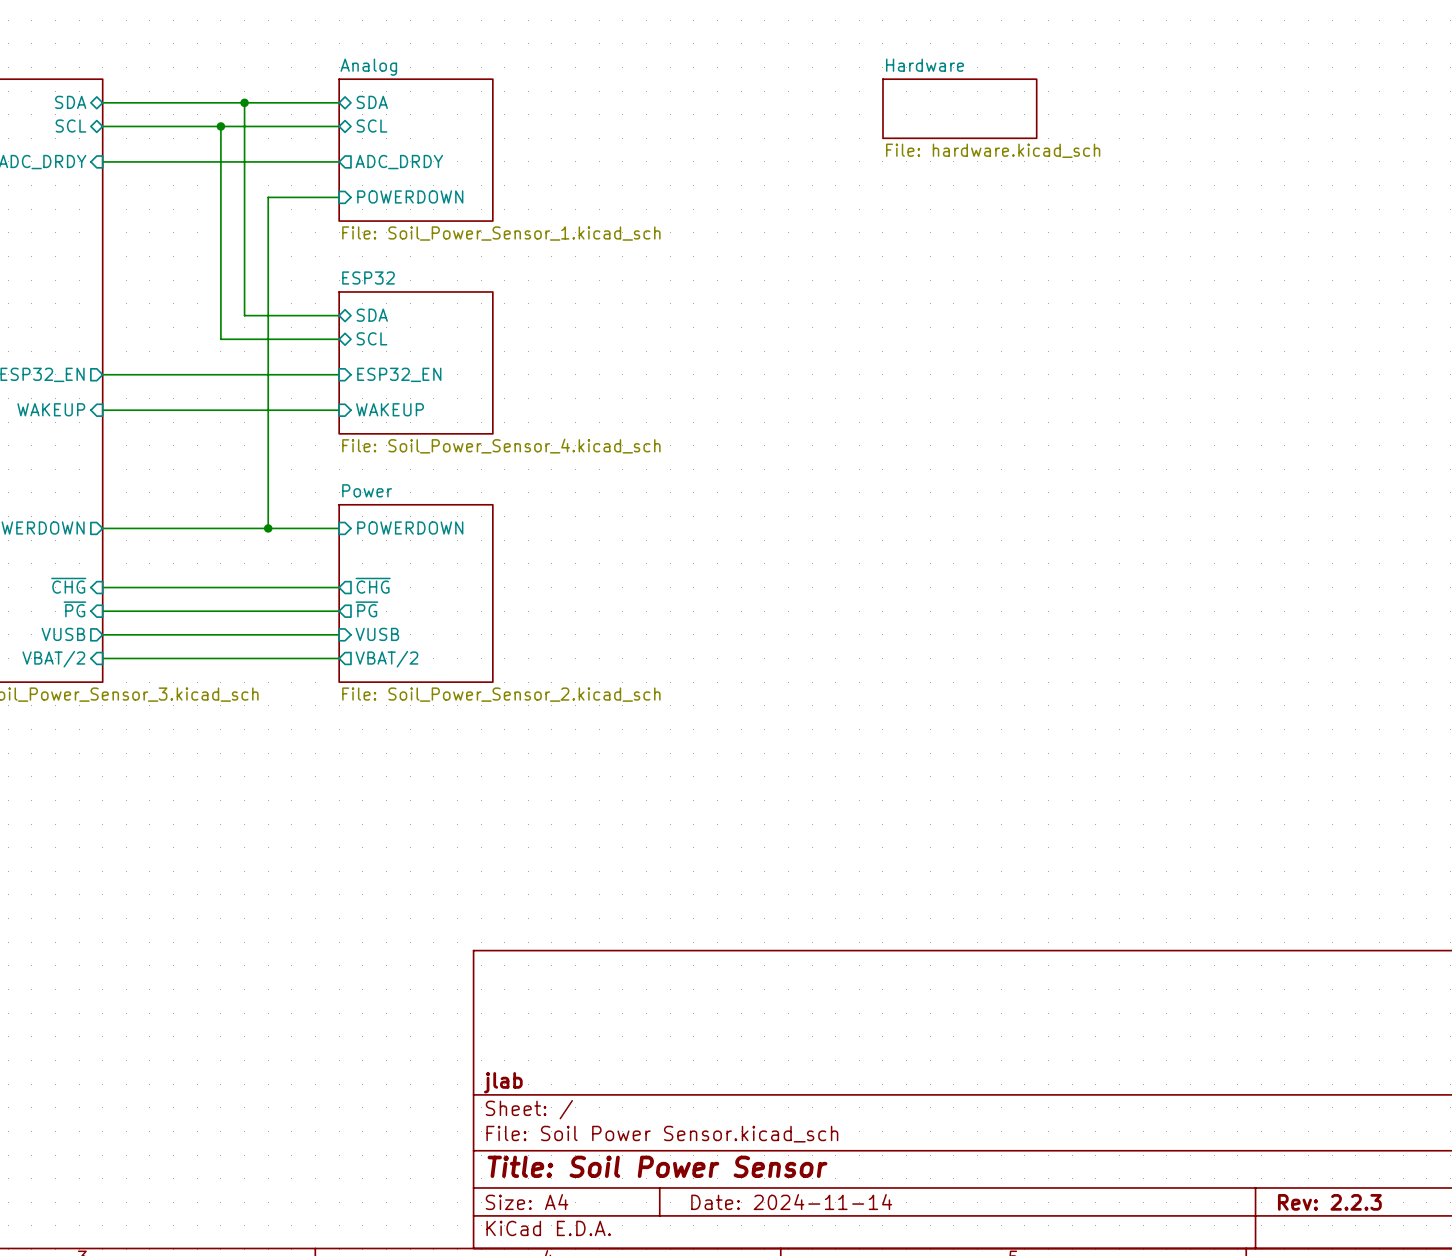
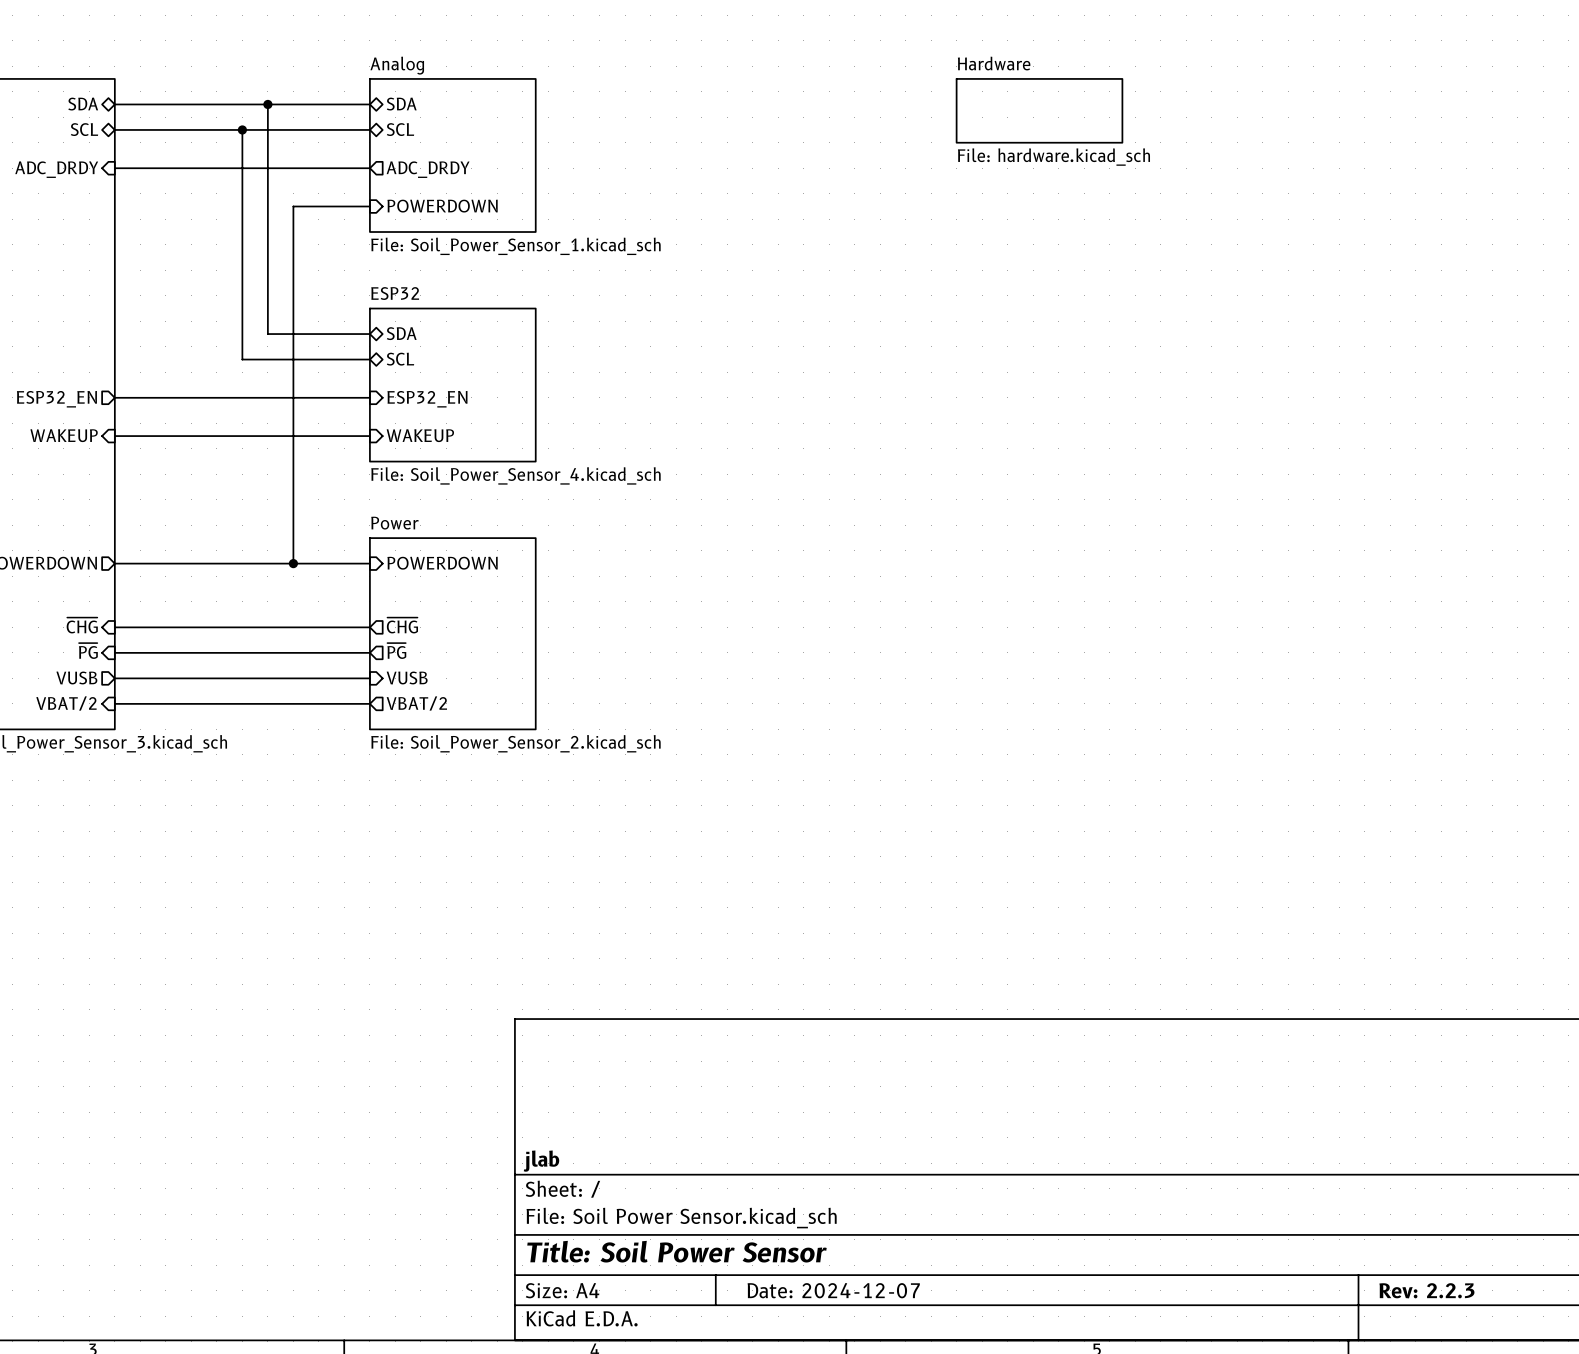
title block: Date: 2024-11-14 (791, 1202) -> Date: 2024-12-07 (833, 1290)

